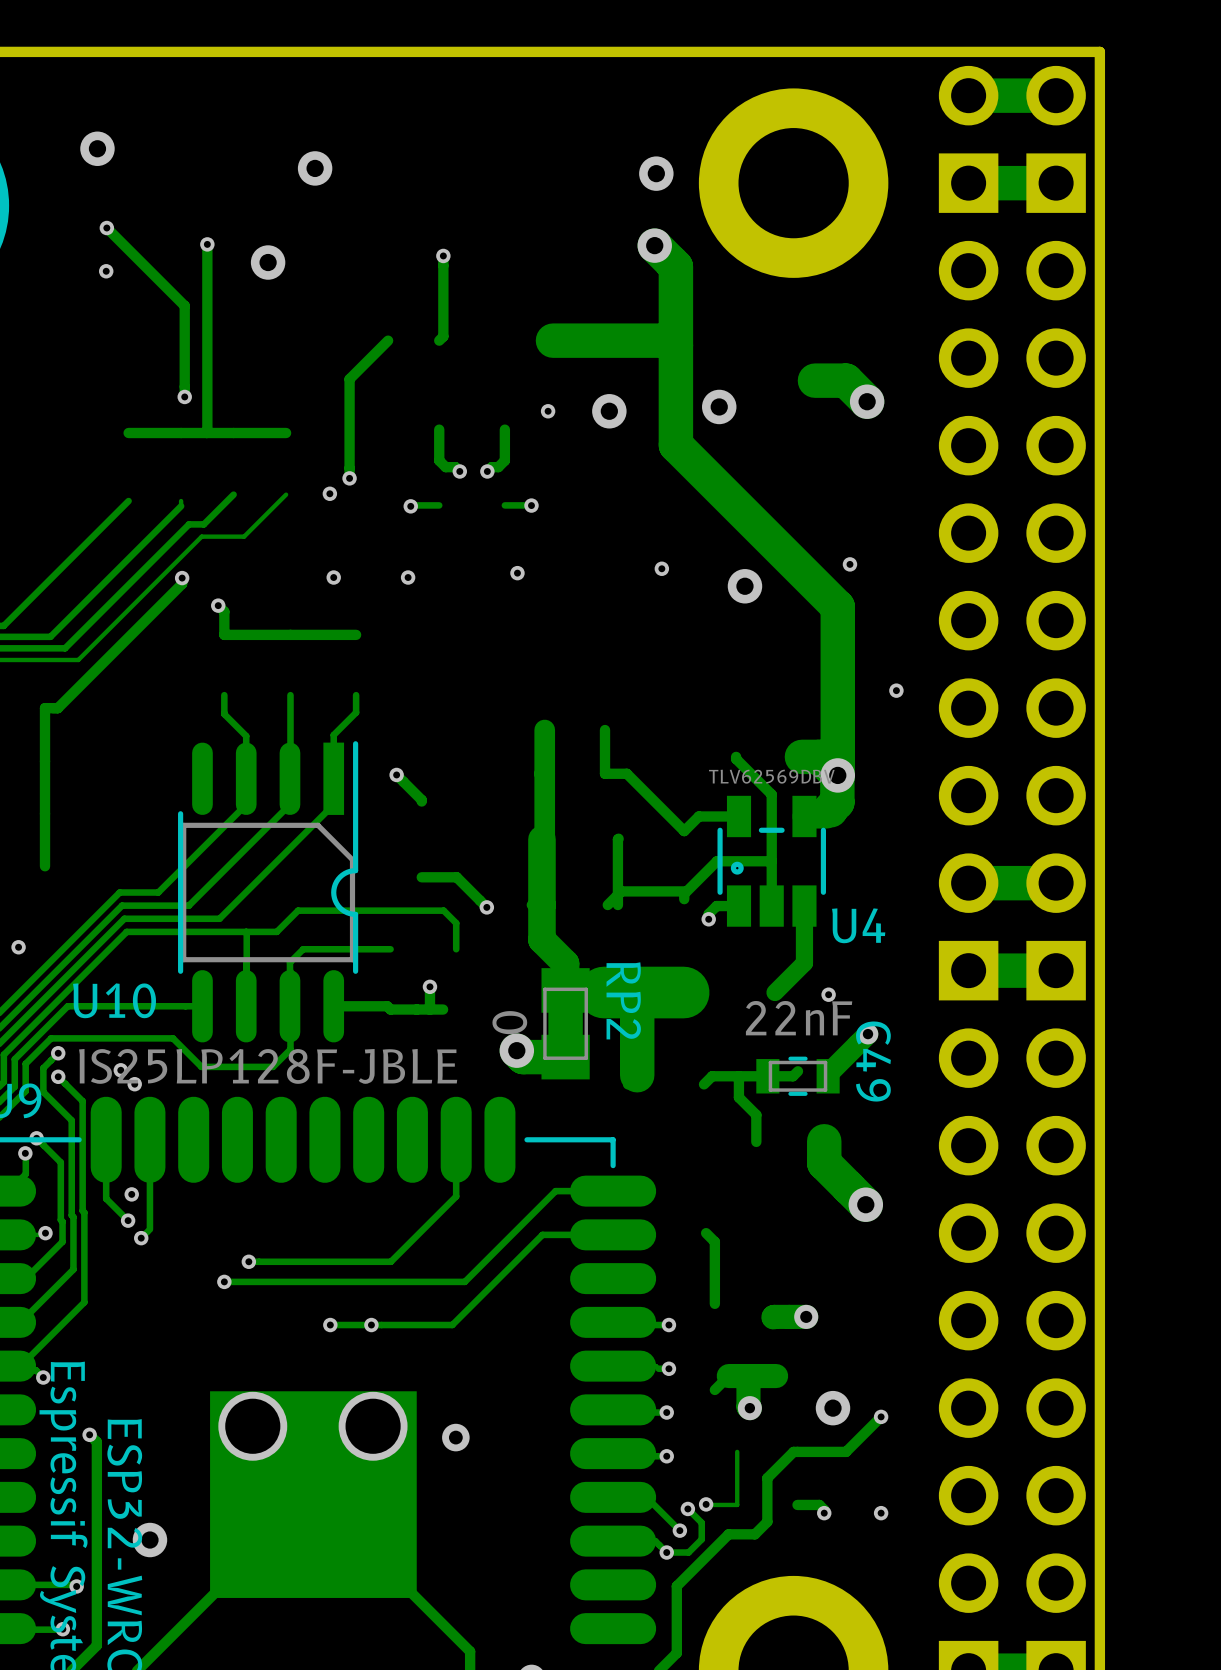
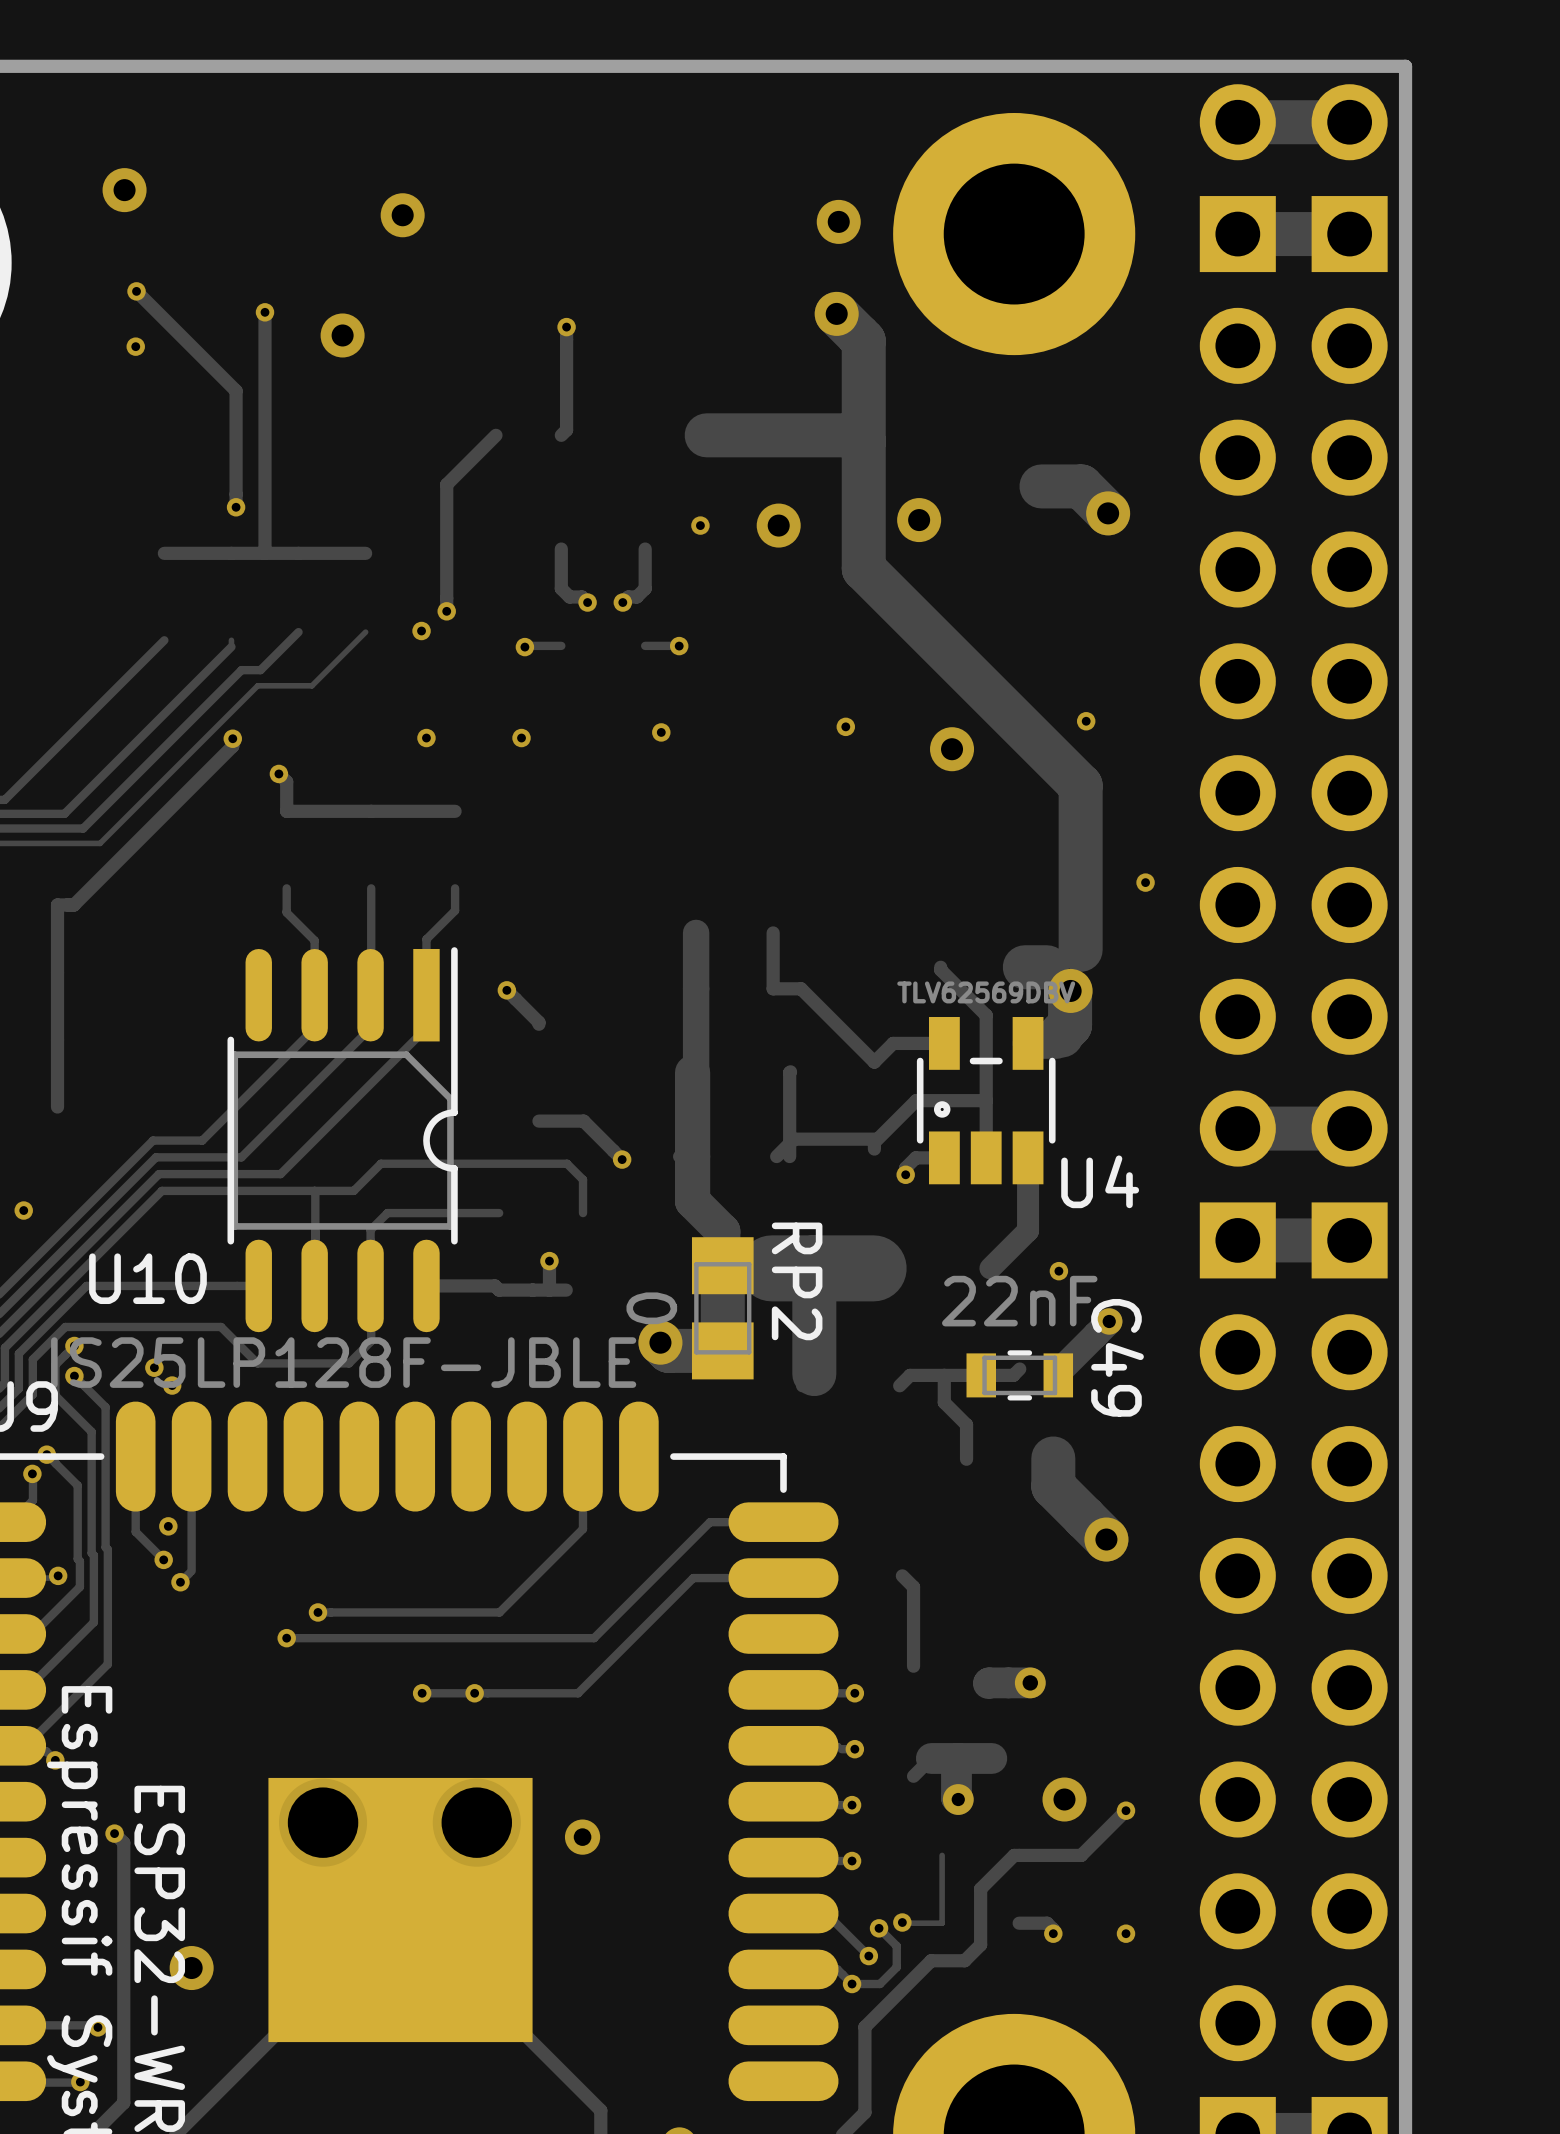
track: (837, 606) (837, 775) (819, 756) -> (1070, 775) (1080, 785) (1080, 949)

